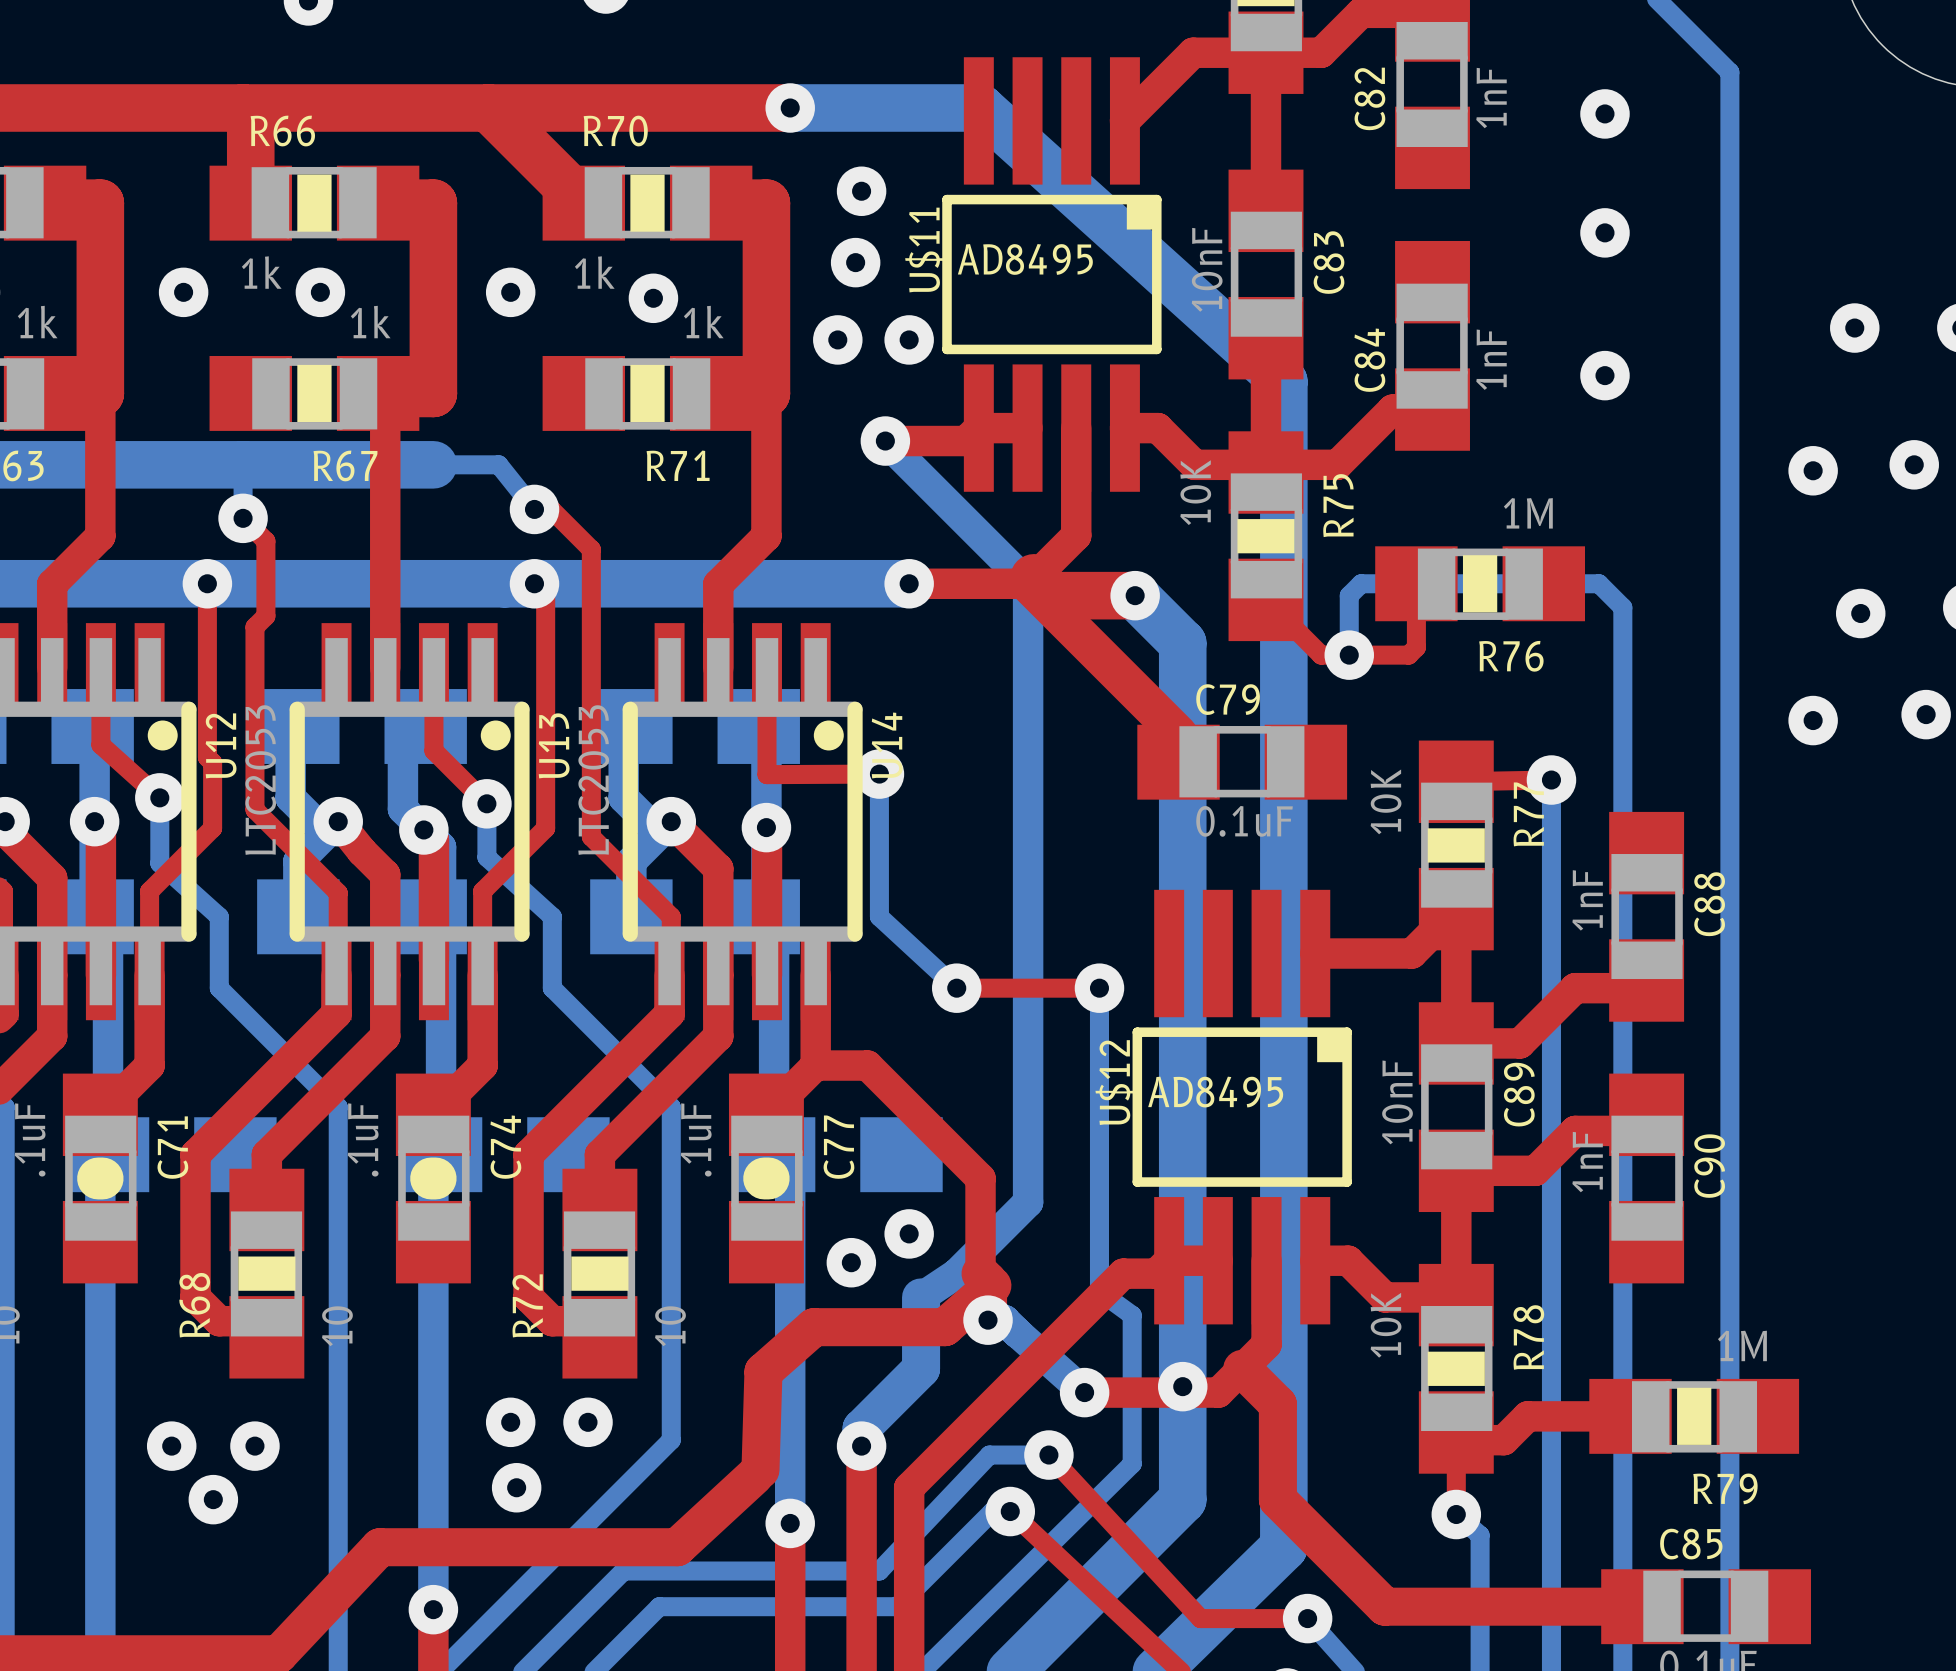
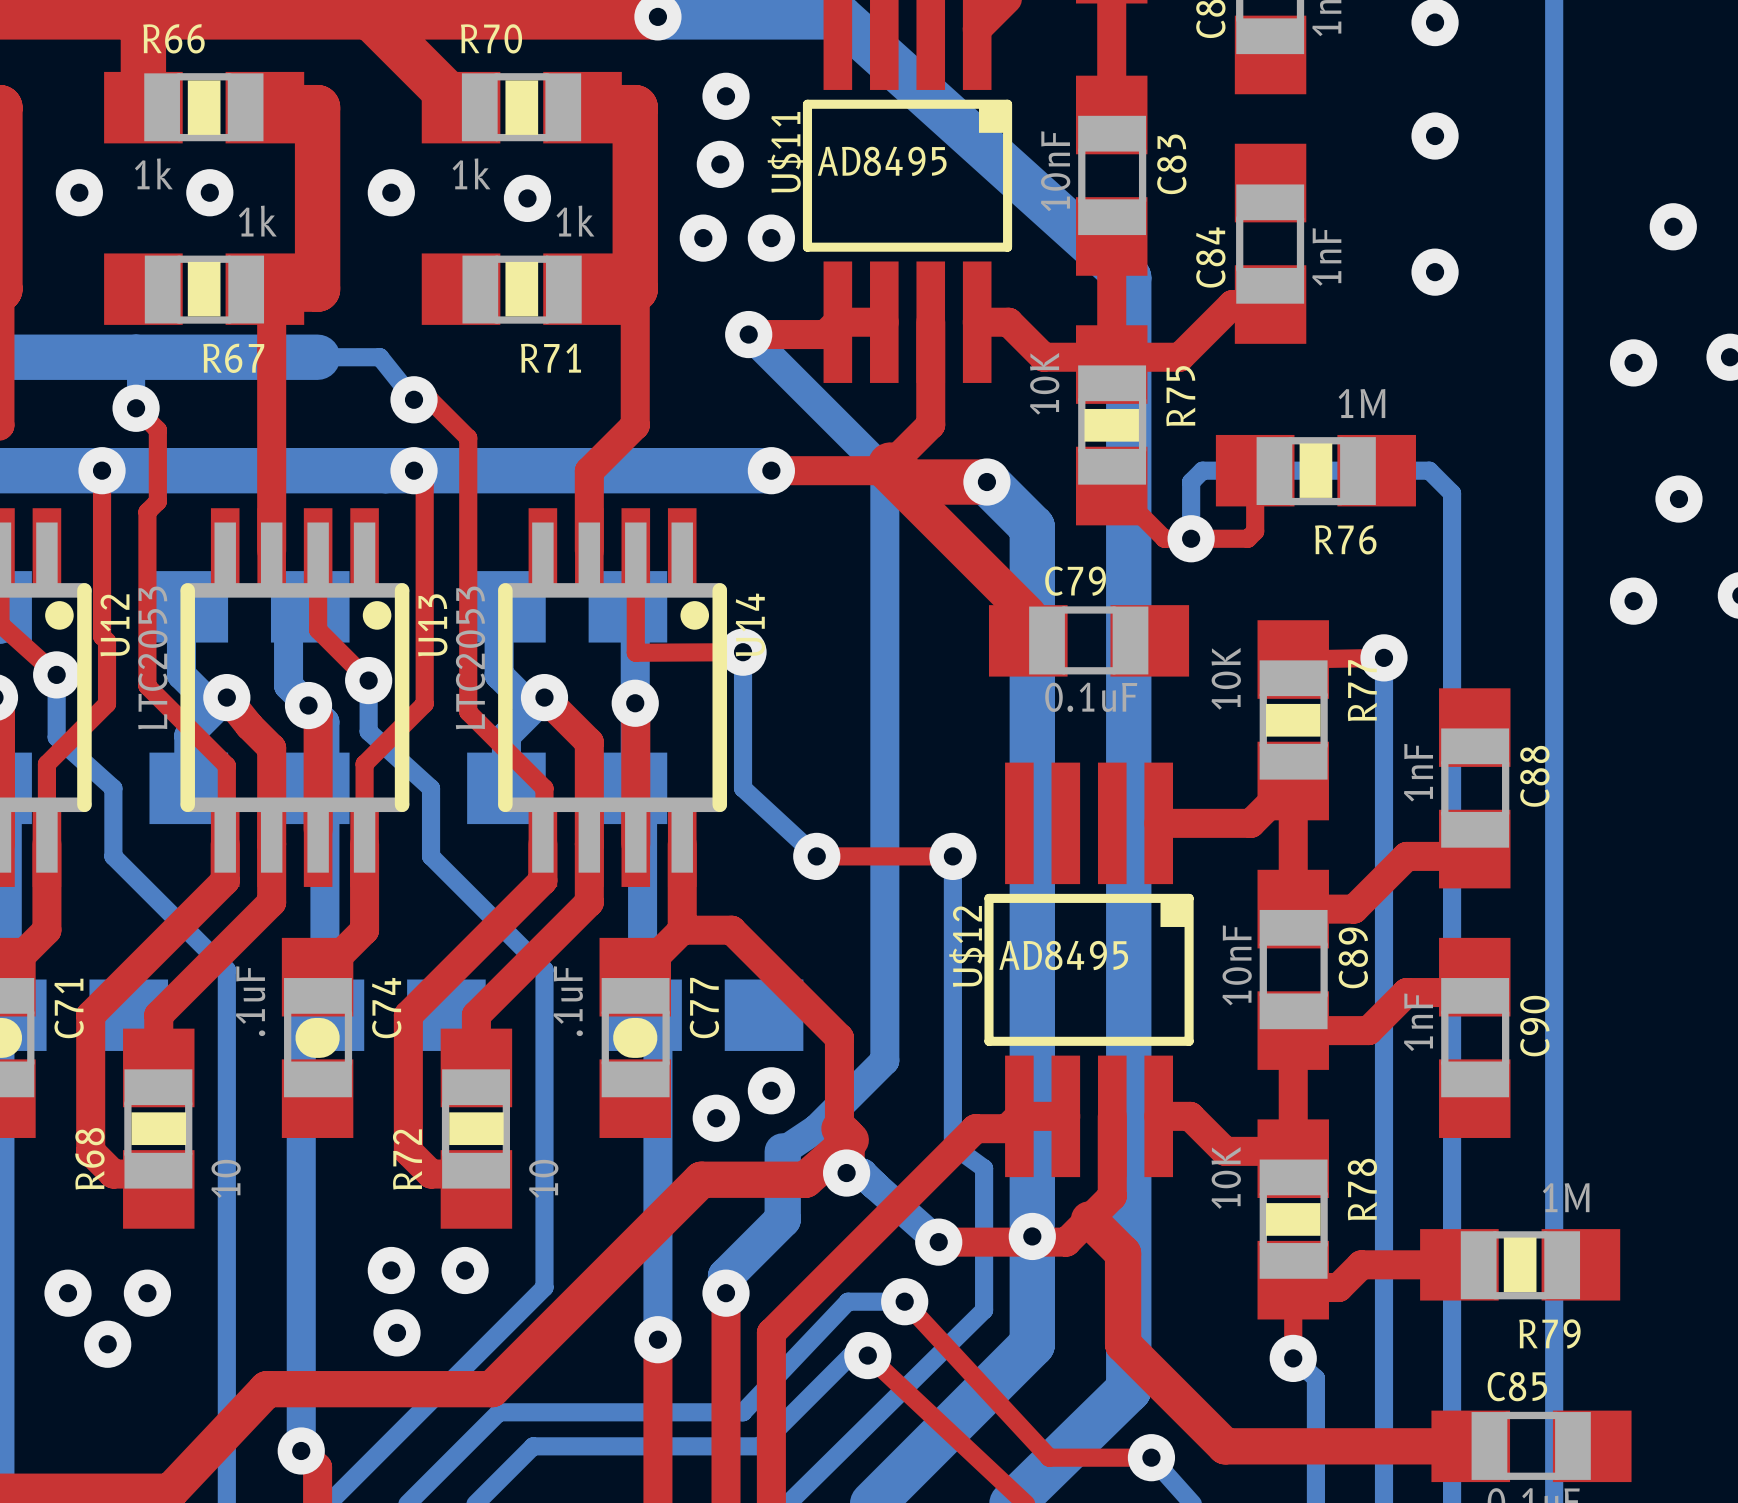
bottom track: (433, 1162) (433, 1609) -> (317, 1022) (301, 1038) (301, 1450)
top track: (835, 1327) (814, 1327) (763, 1371) (760, 1469) (677, 1547) (379, 1547) -> (701, 1179) (491, 1389) (266, 1389)
via position: (790, 1523) -> (657, 1339)
via position: (433, 1609) -> (301, 1450)

